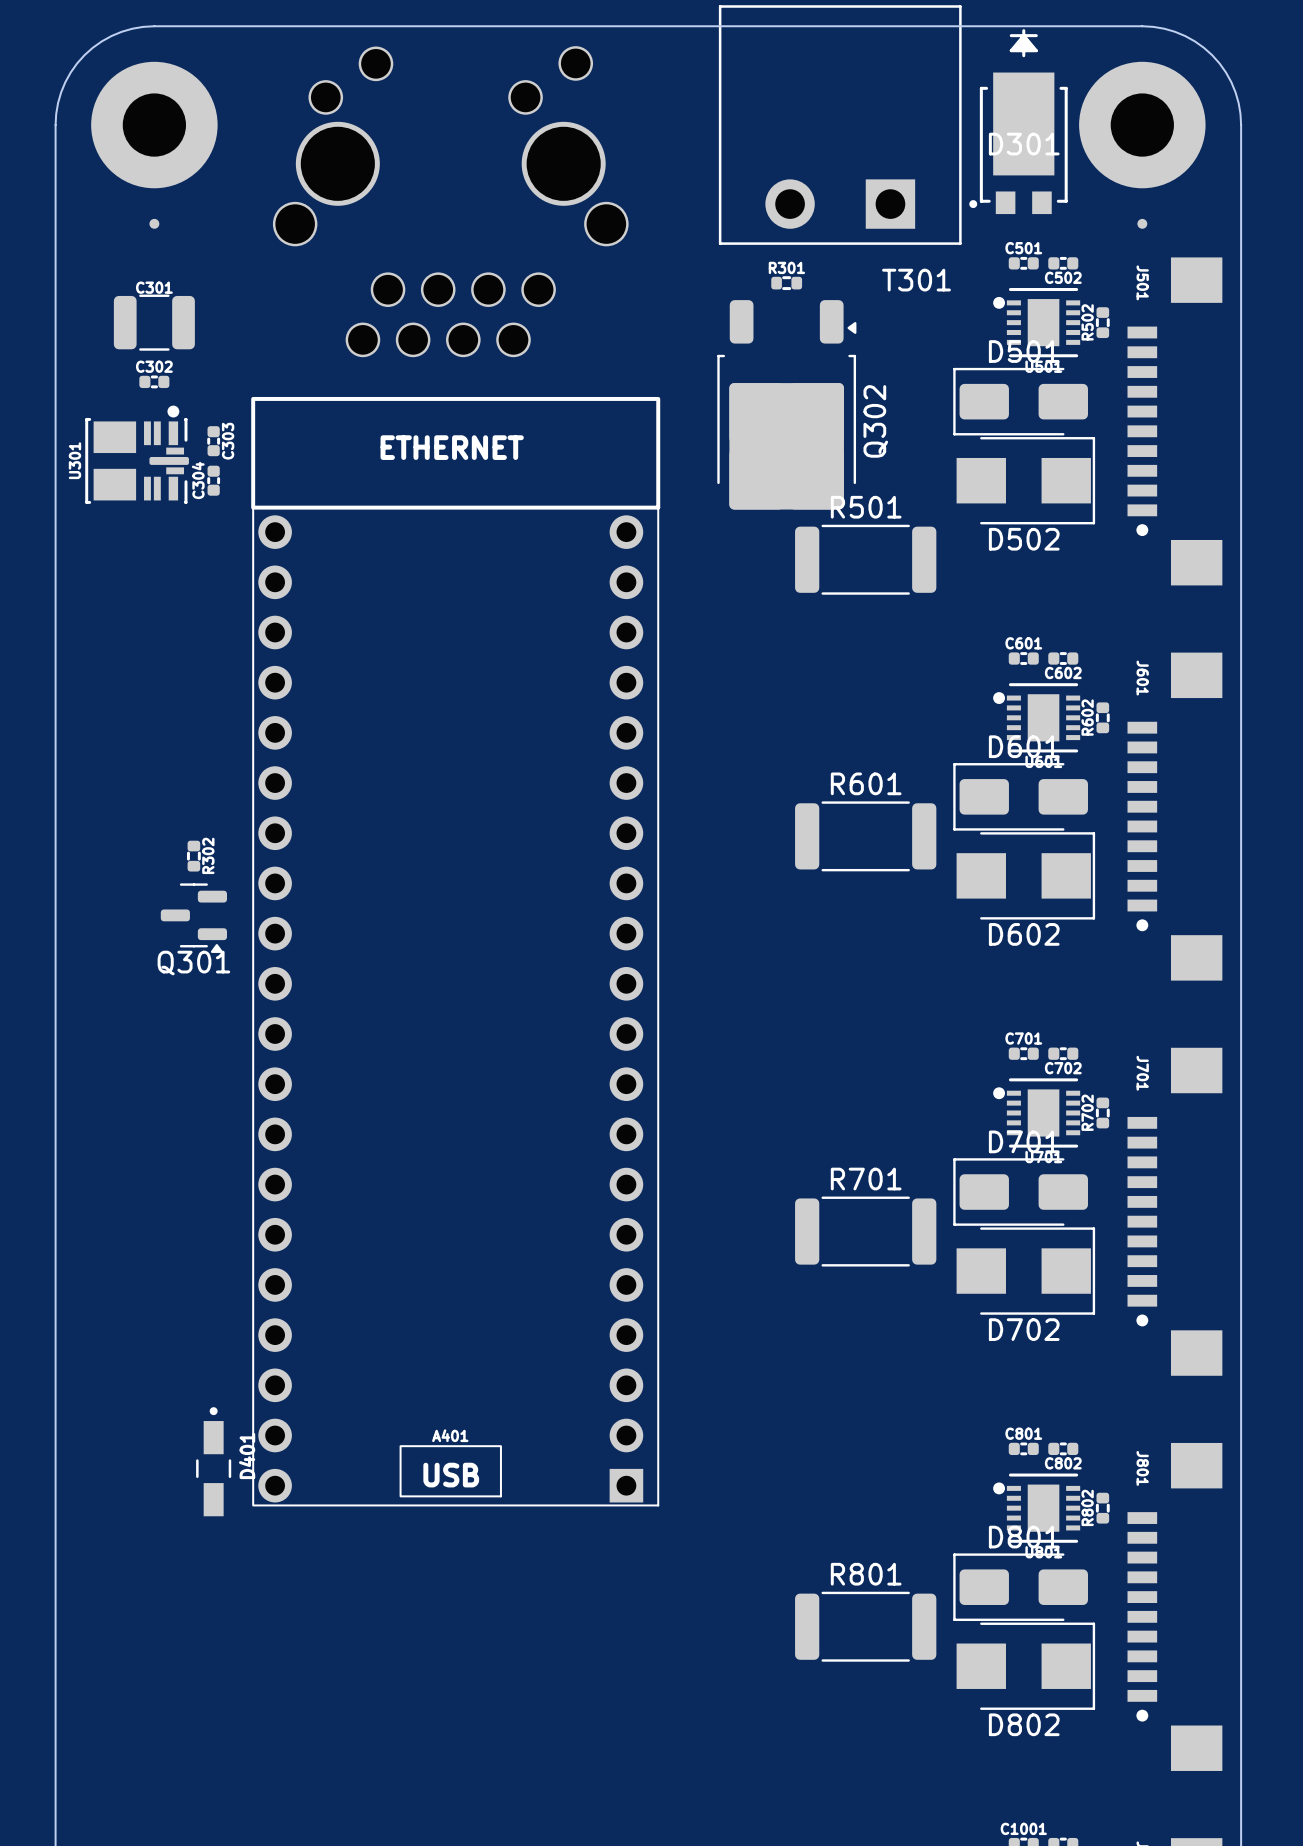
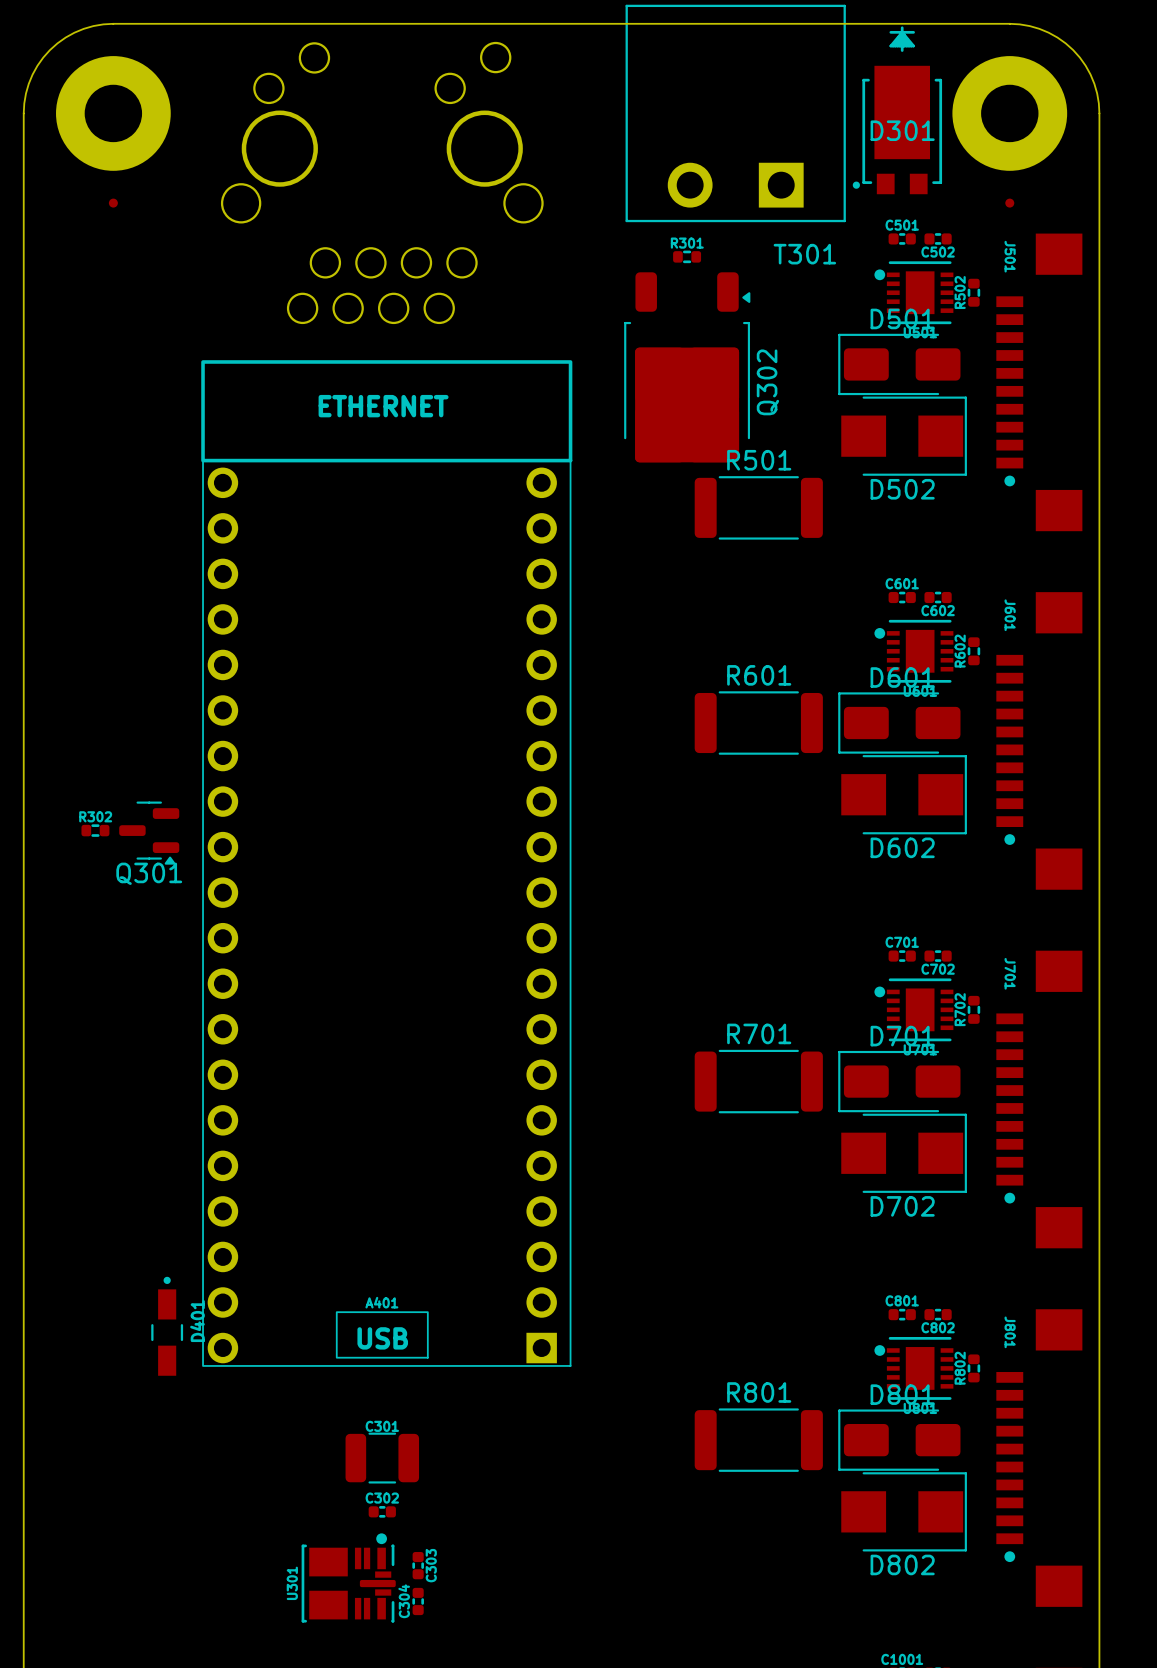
C301 position: (154, 322) -> (382, 1458)
C302 position: (154, 381) -> (382, 1511)
C303 position: (213, 441) -> (418, 1565)
U301 position: (137, 454) -> (348, 1577)
C304 position: (213, 480) -> (418, 1601)
R601 position: (865, 836) -> (758, 723)
R302 rotation: 0° (193, 856) -> 90° clockwise (95, 830)
R302 position: (193, 856) -> (95, 830)
R701 position: (865, 1231) -> (758, 1081)
R801 position: (865, 1626) -> (758, 1440)

